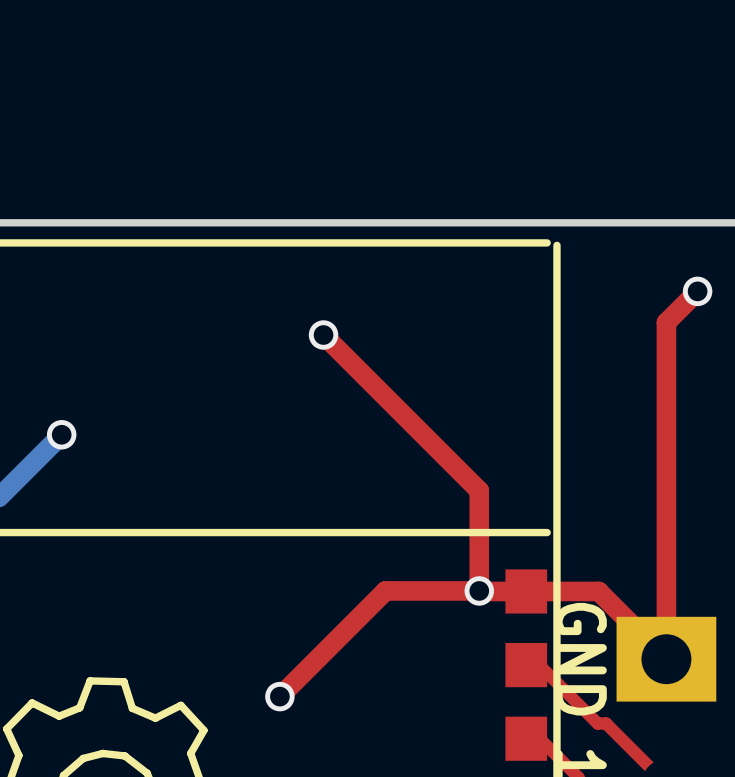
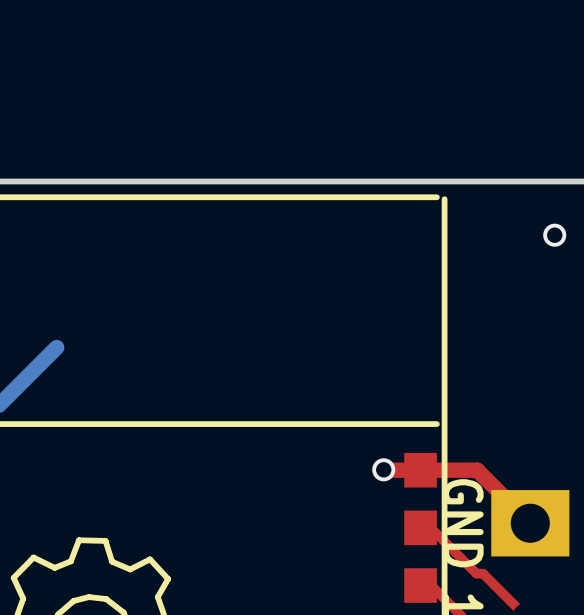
top track: (697, 291) (666, 322) (666, 659) -> none
top track: (323, 335) (479, 490) (479, 590) (385, 590) (279, 696) -> none
via: (323, 335) -> none
via: (61, 434) -> none
via: (279, 696) -> none

